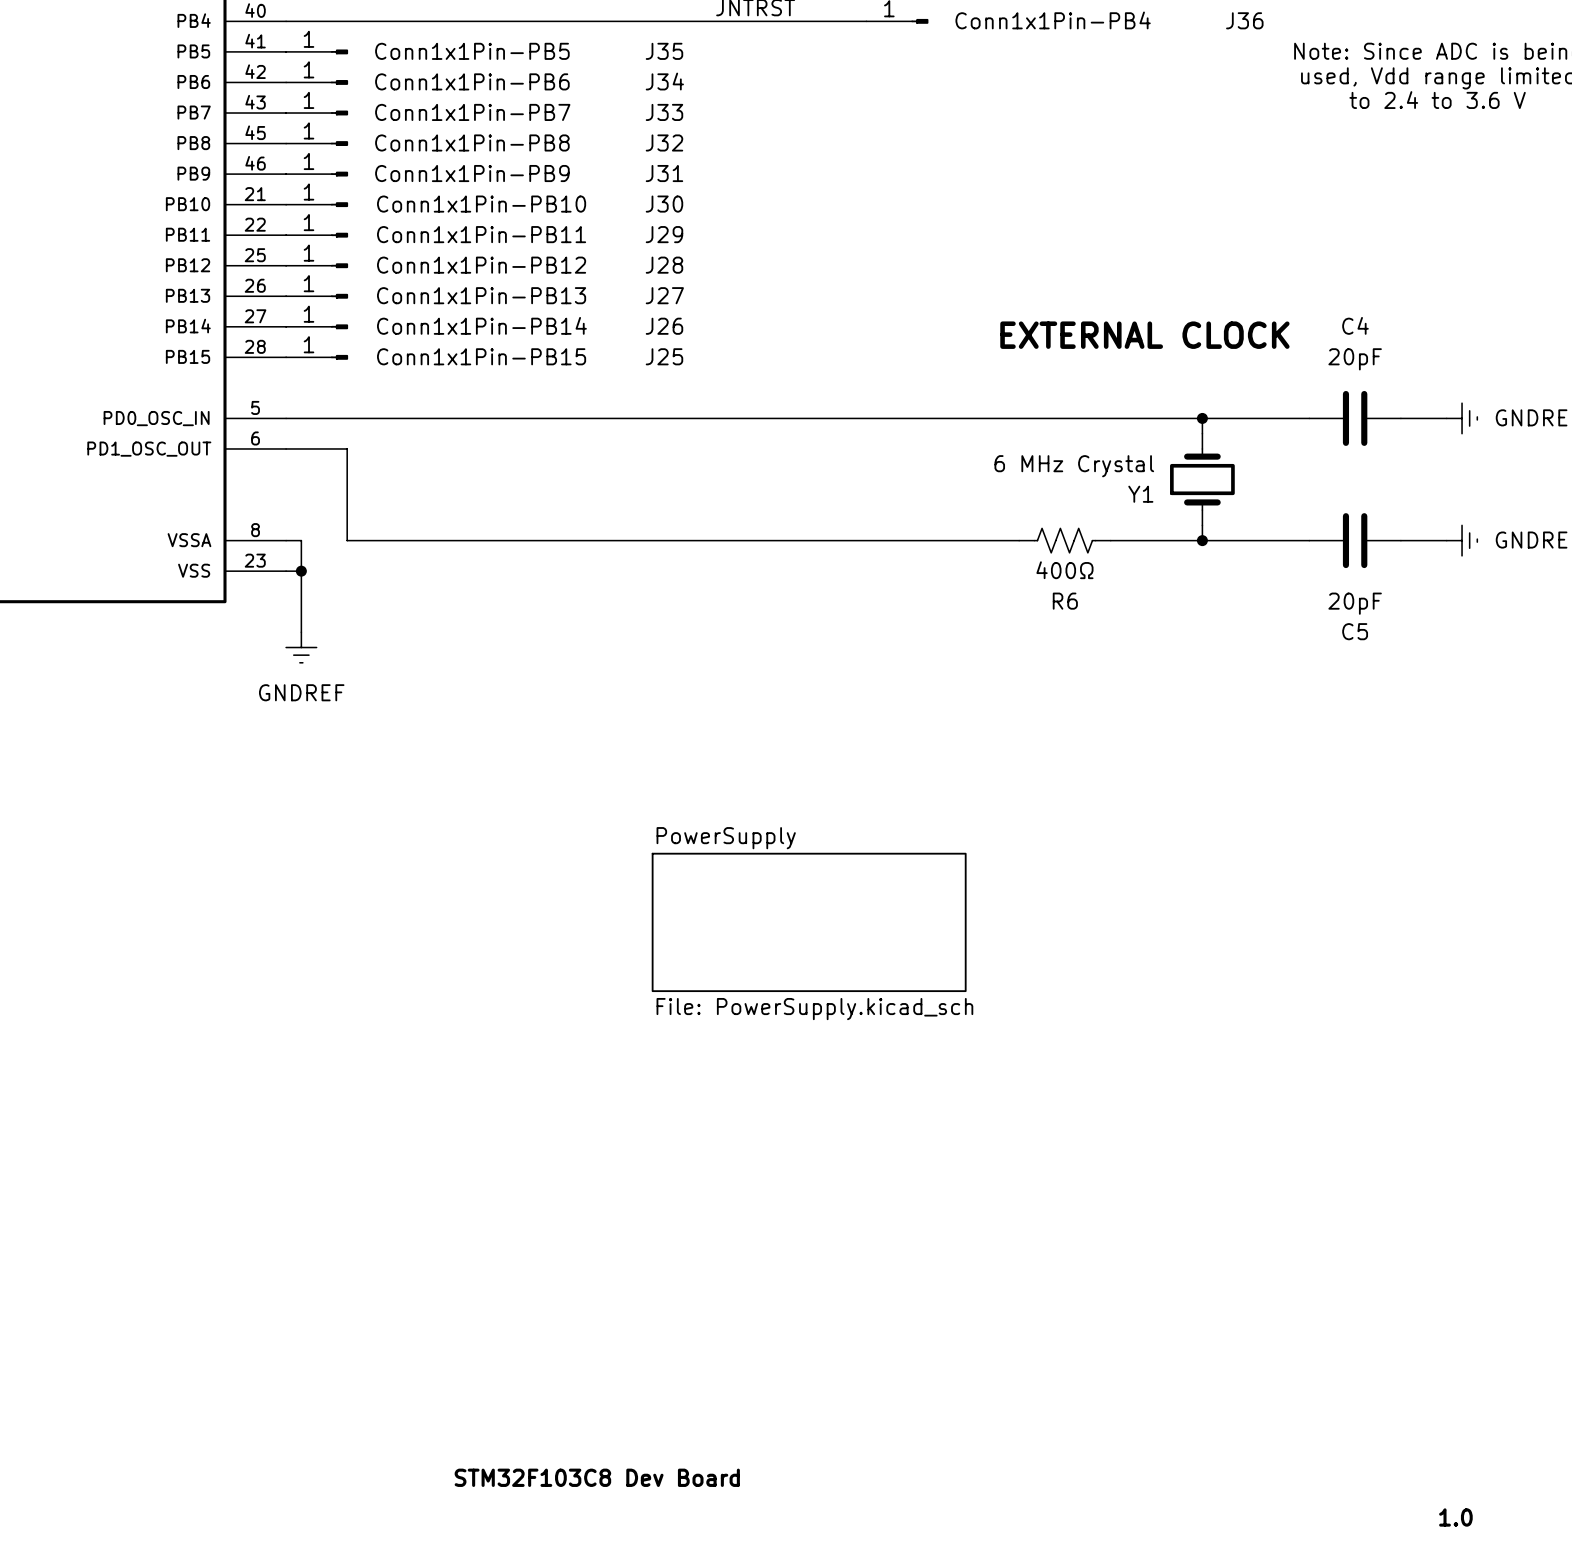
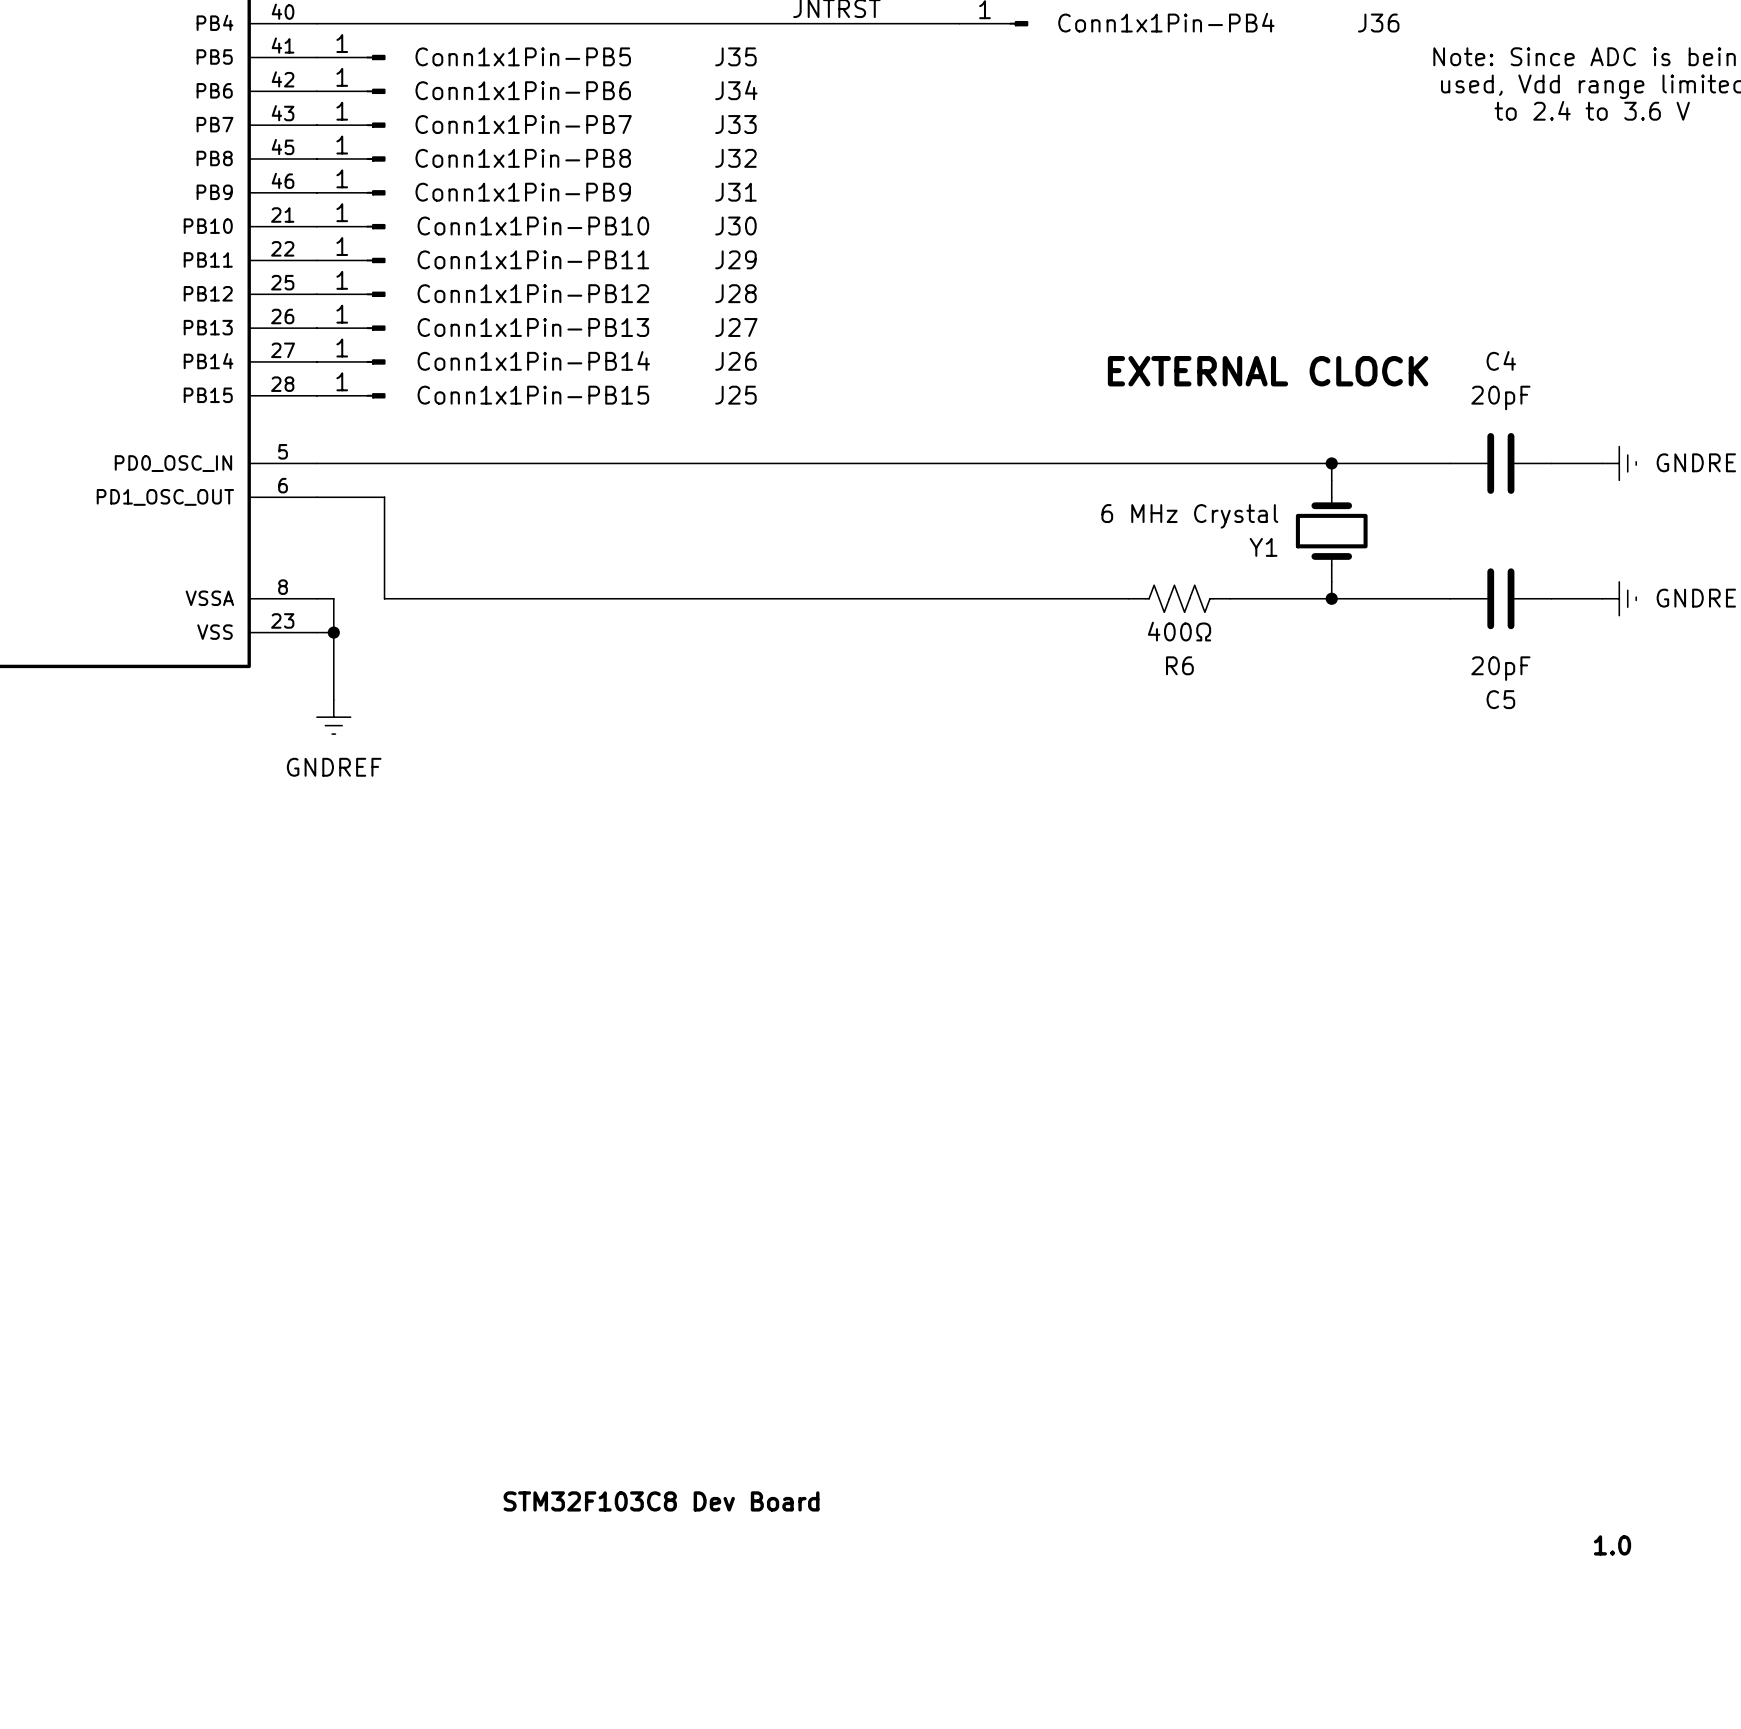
sheet PowerSupply: File: PowerSupply.kicad_sch (809, 922) -> none
text position: STM32F103C8 Dev Board (597, 1477) -> STM32F103C8 Dev Board (661, 1501)
text position: 1.0 (1455, 1517) -> 1.0 (1612, 1545)

